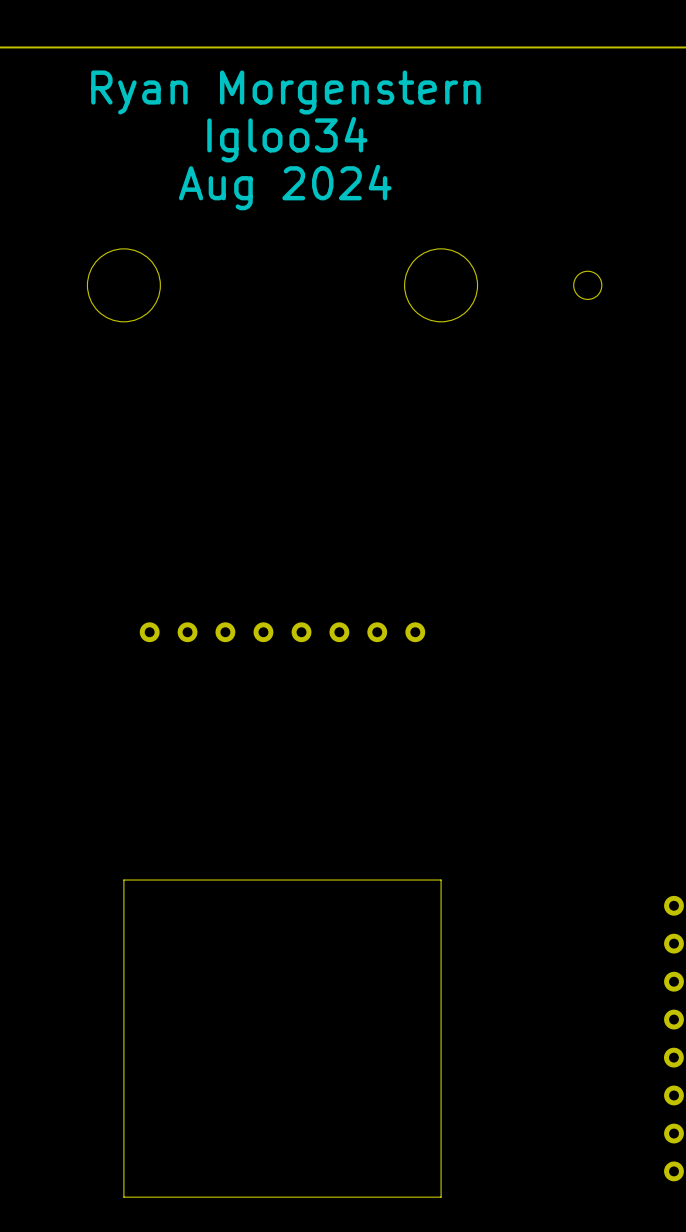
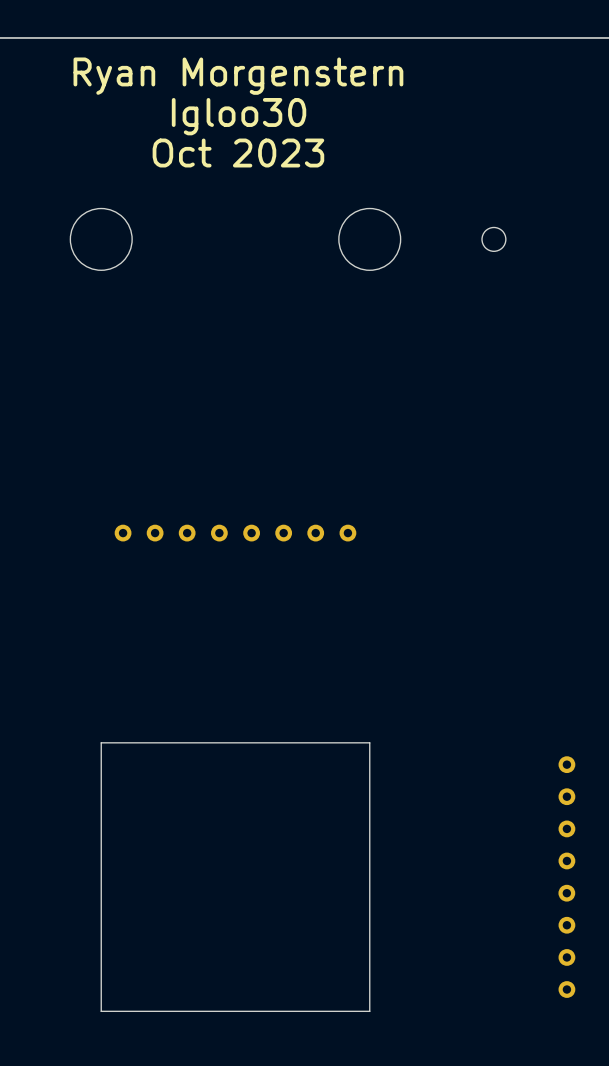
text: Igloo34 (287, 139) -> Igloo30 (239, 116)
text: Aug 2024 (285, 187) -> Oct 2023 (238, 153)

